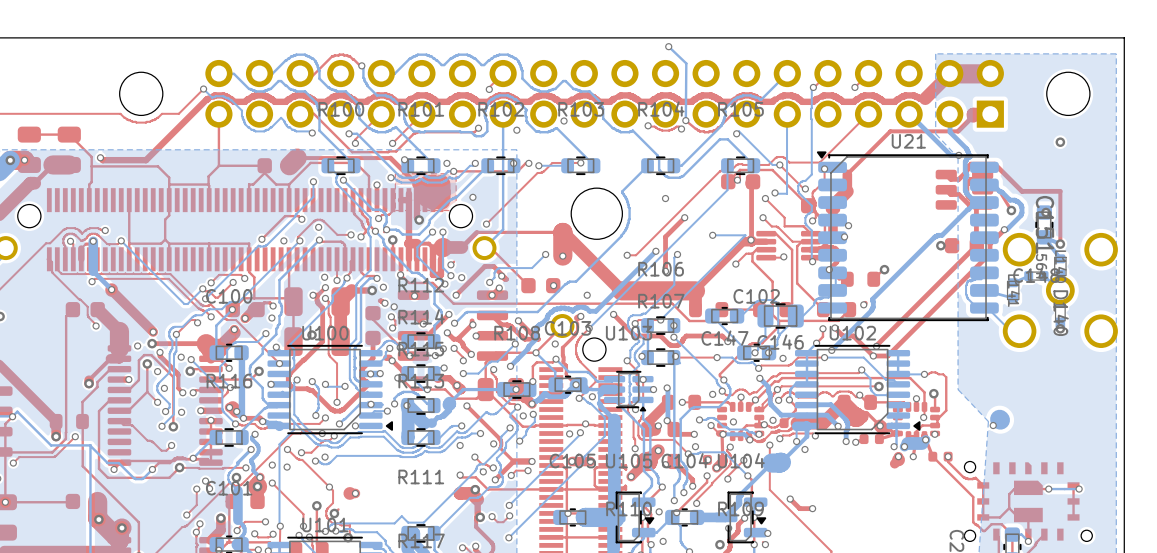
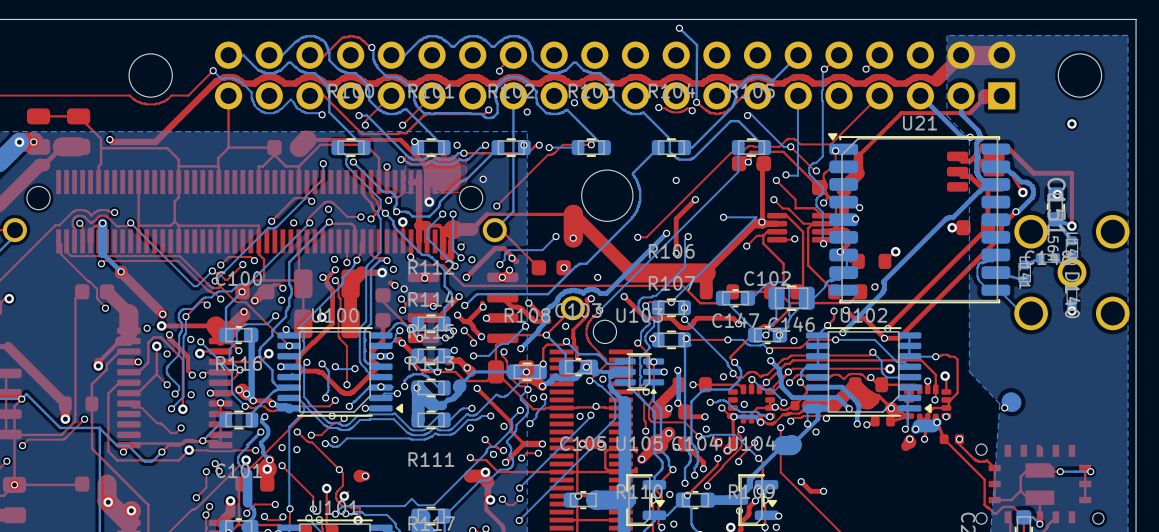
via: (164, 388) -> none
bottom track: none -> (751, 379) (761, 388) (770, 388) (783, 402)

